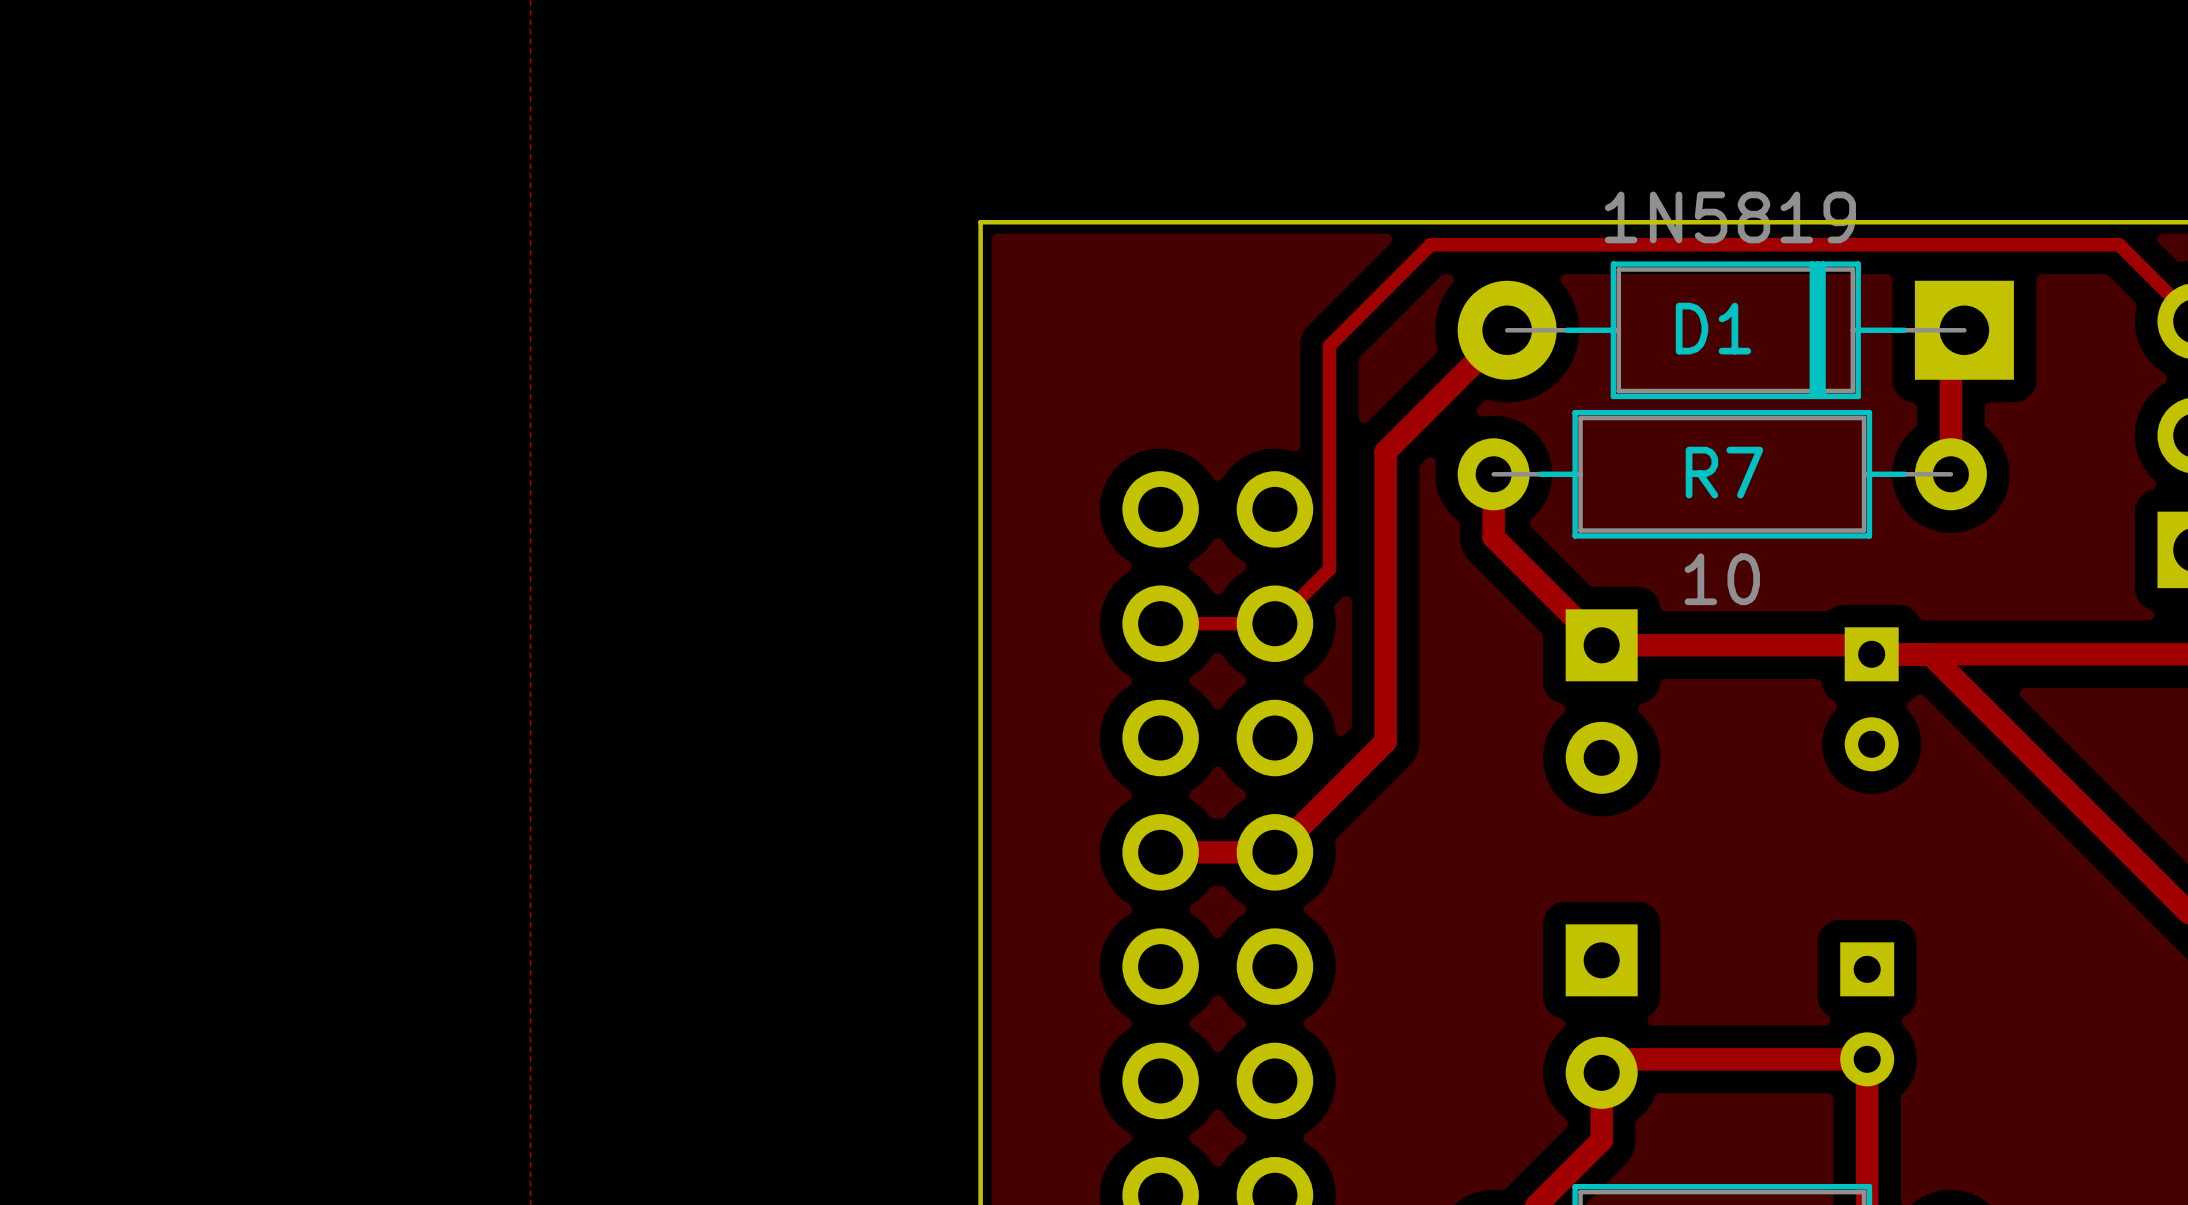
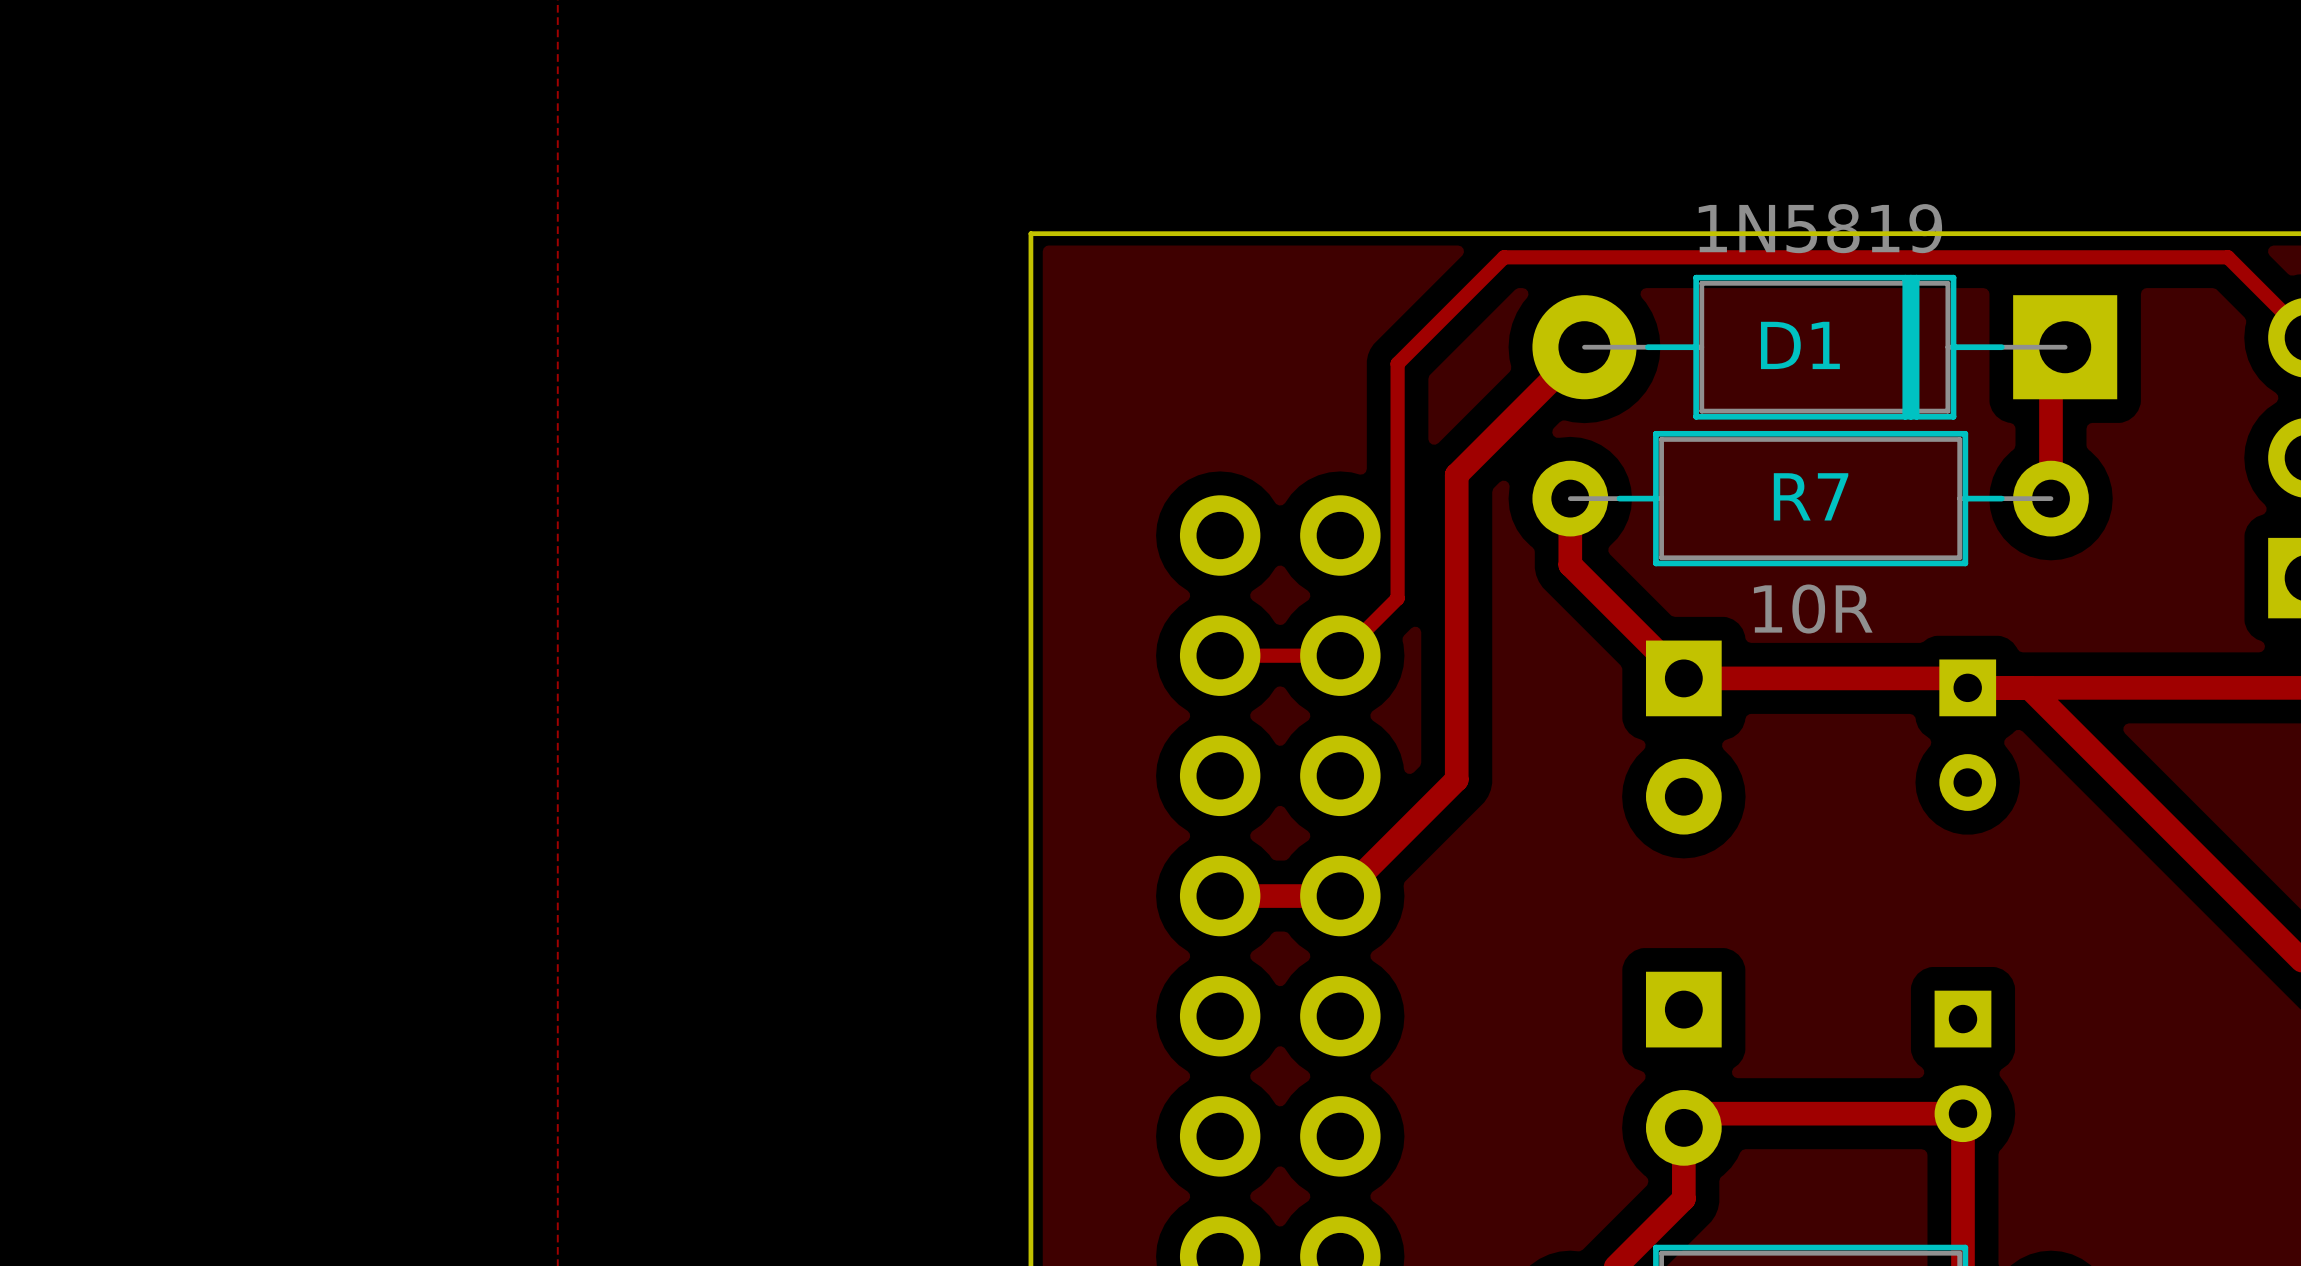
R7 value: 10 (1722, 579) -> 10R (1813, 609)

